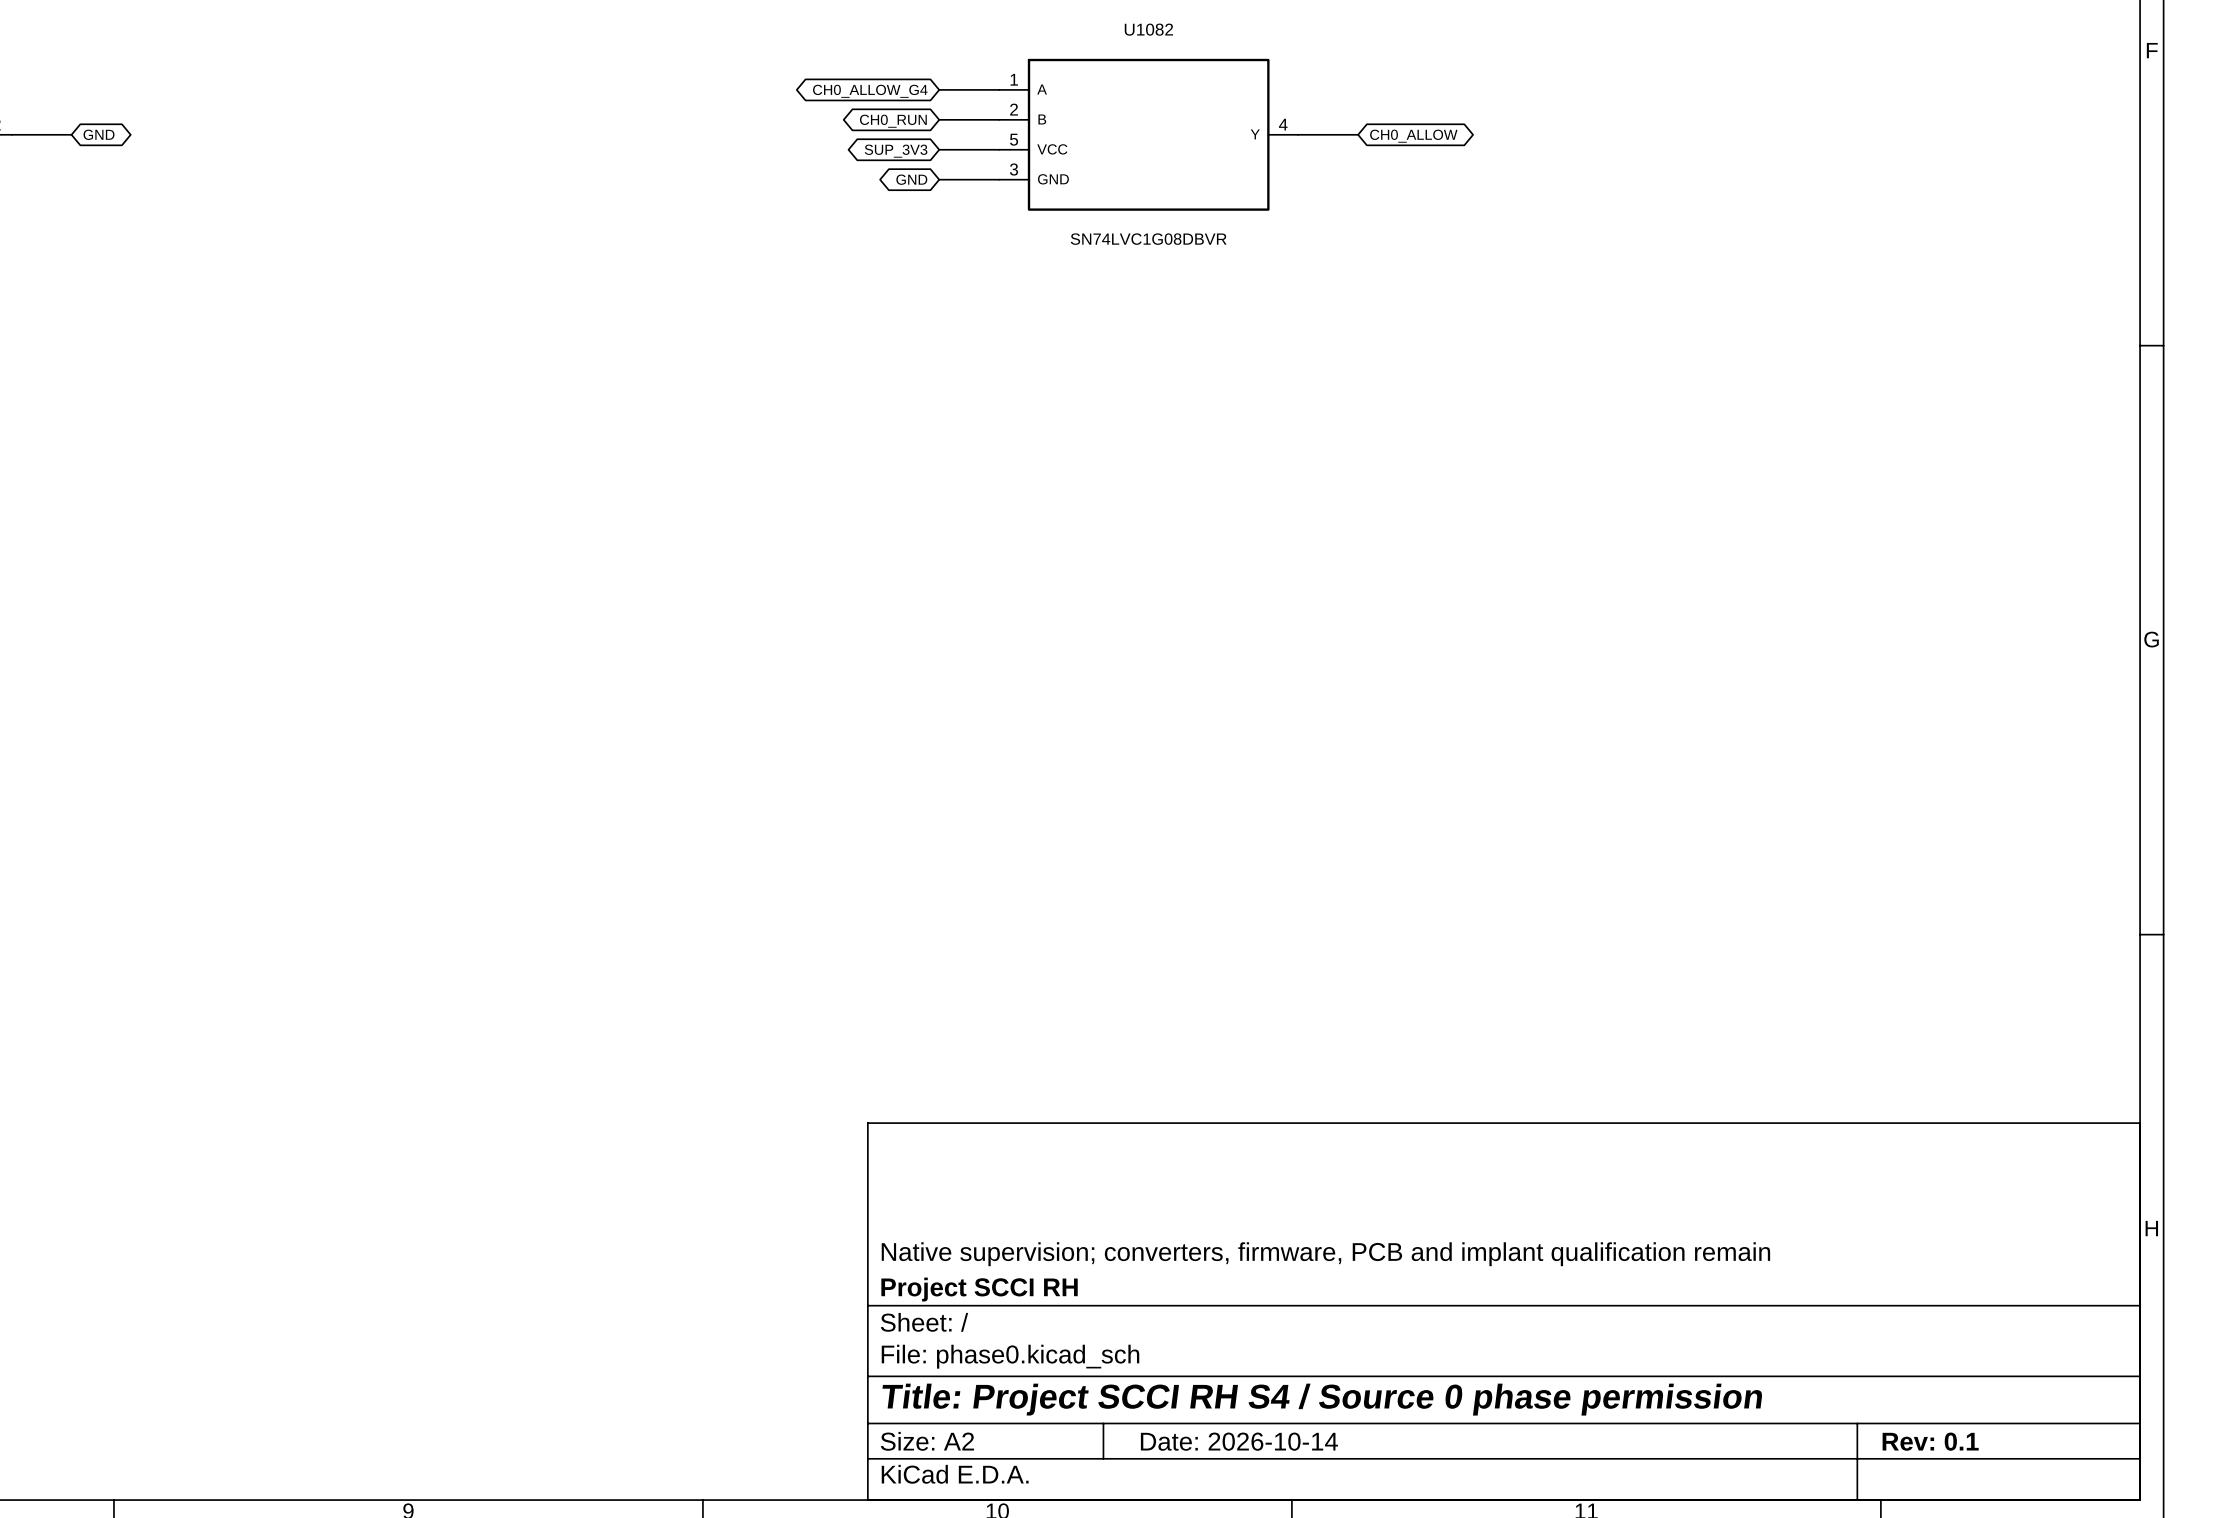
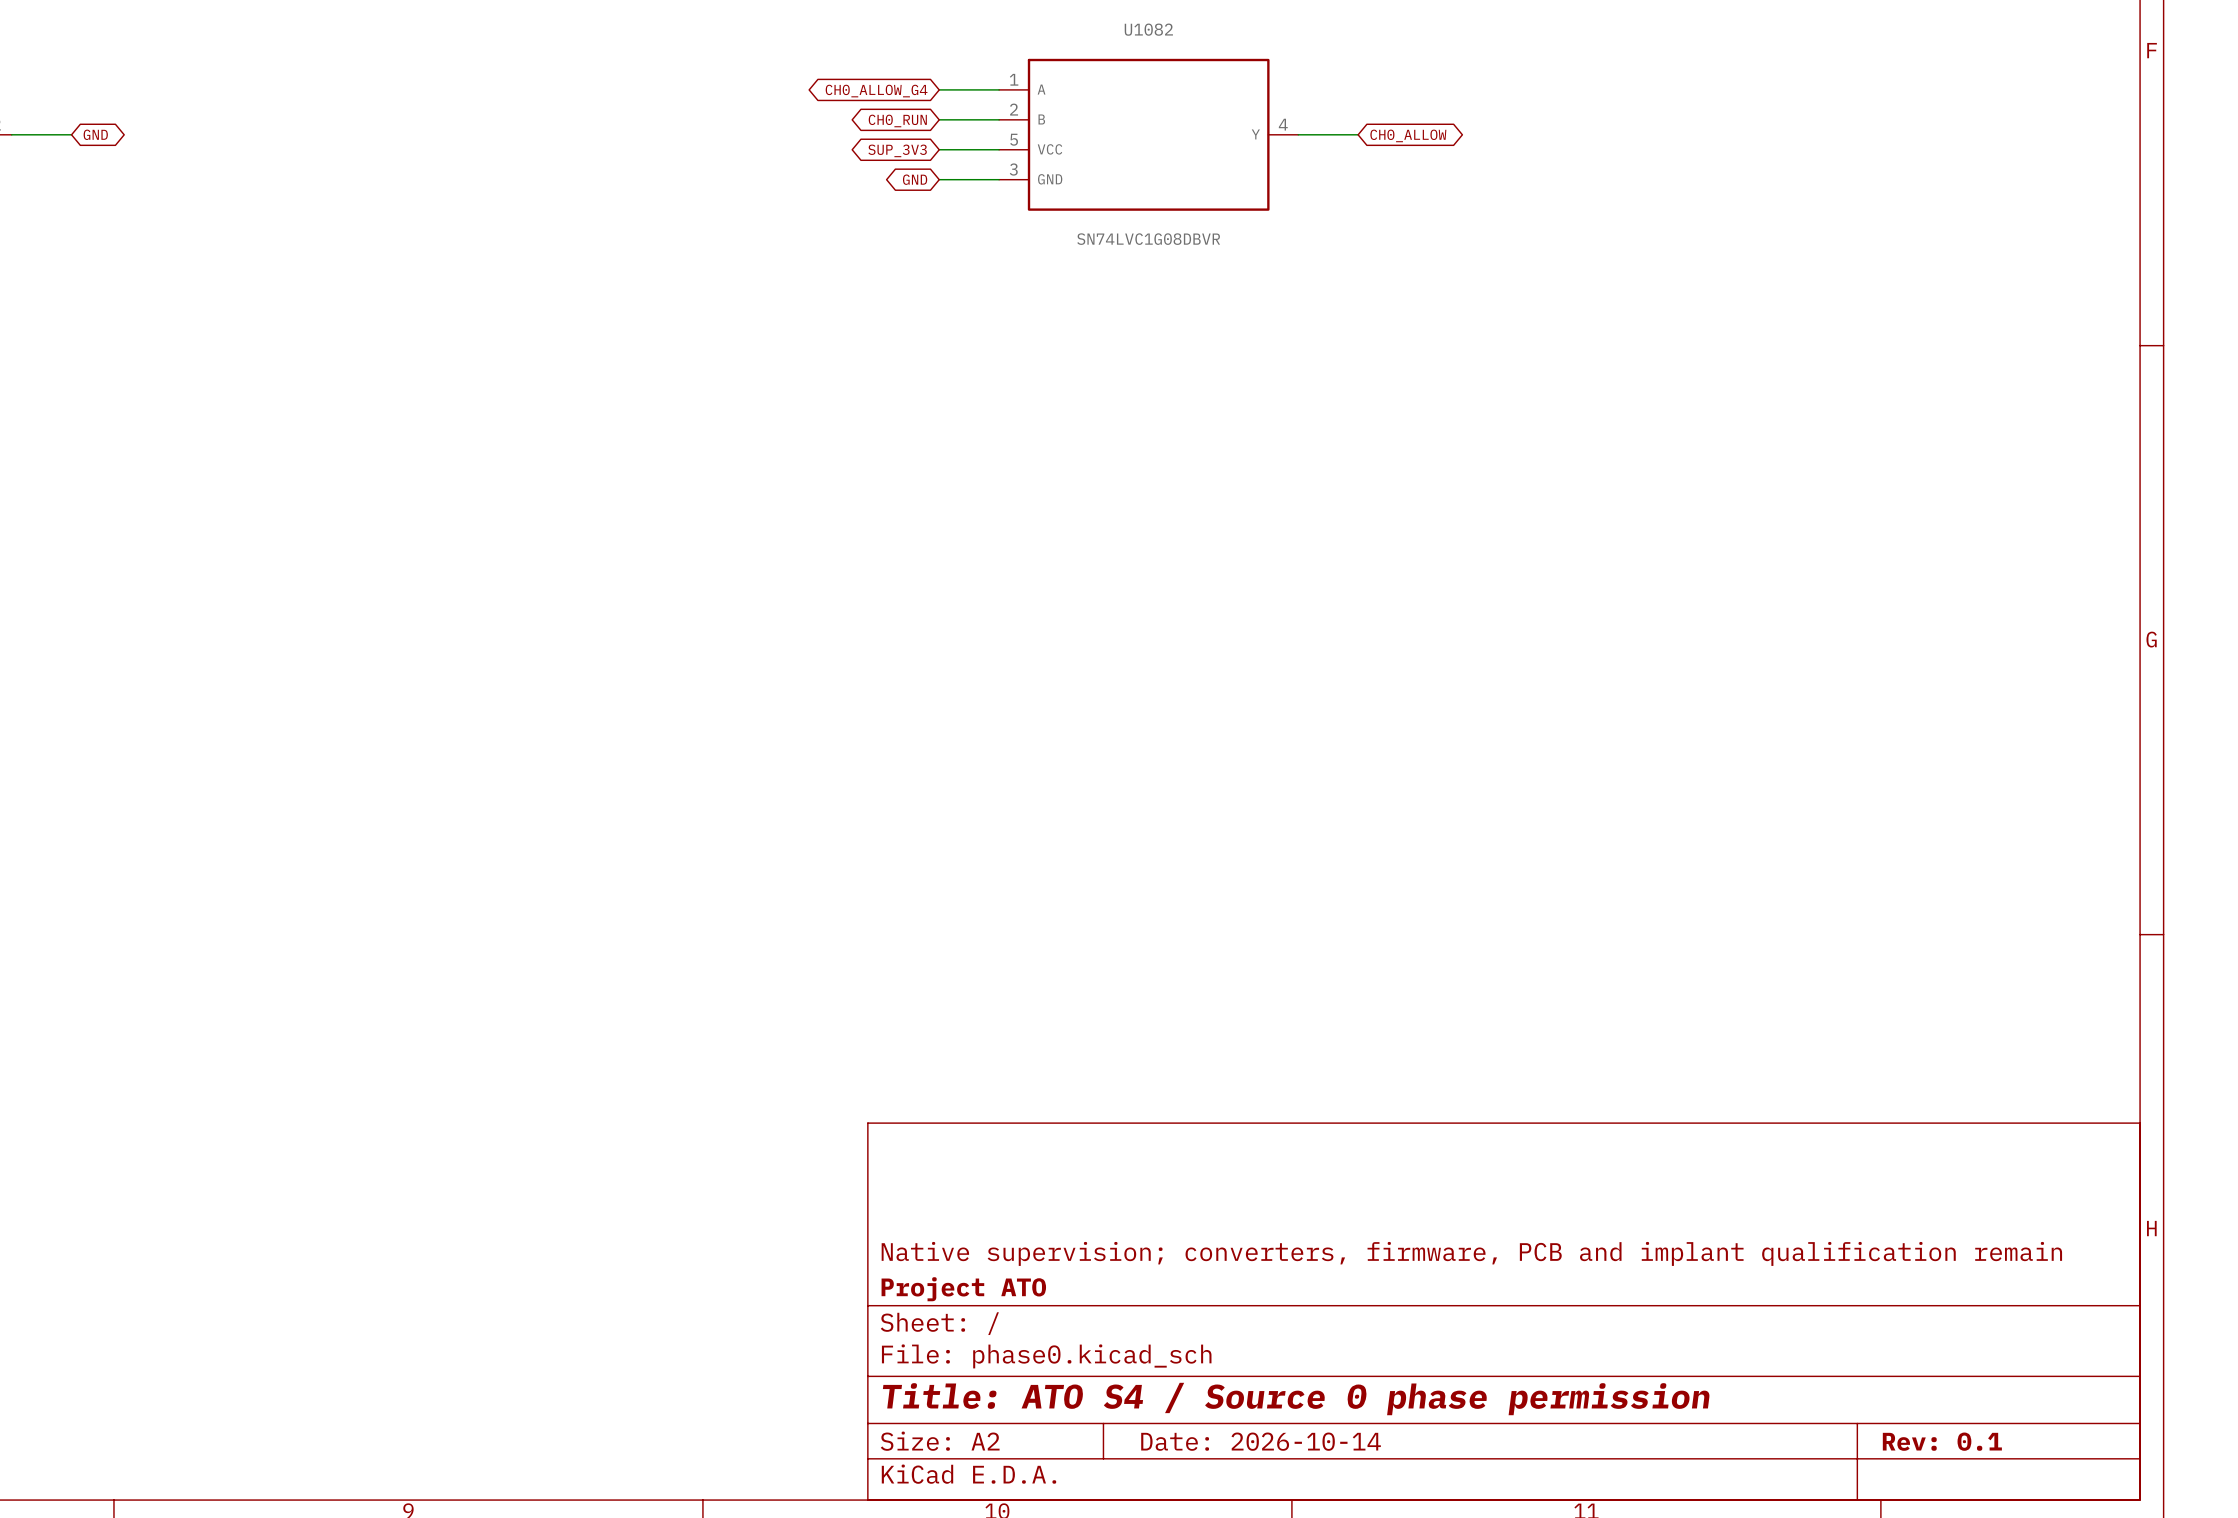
title block: Project SCCI RH (979, 1289) -> Project ATO (963, 1289)
title block: Title: Project SCCI RH S4 / Source 0 phase permission (1322, 1399) -> Title: ATO S4 / Source 0 phase permission (1296, 1399)

